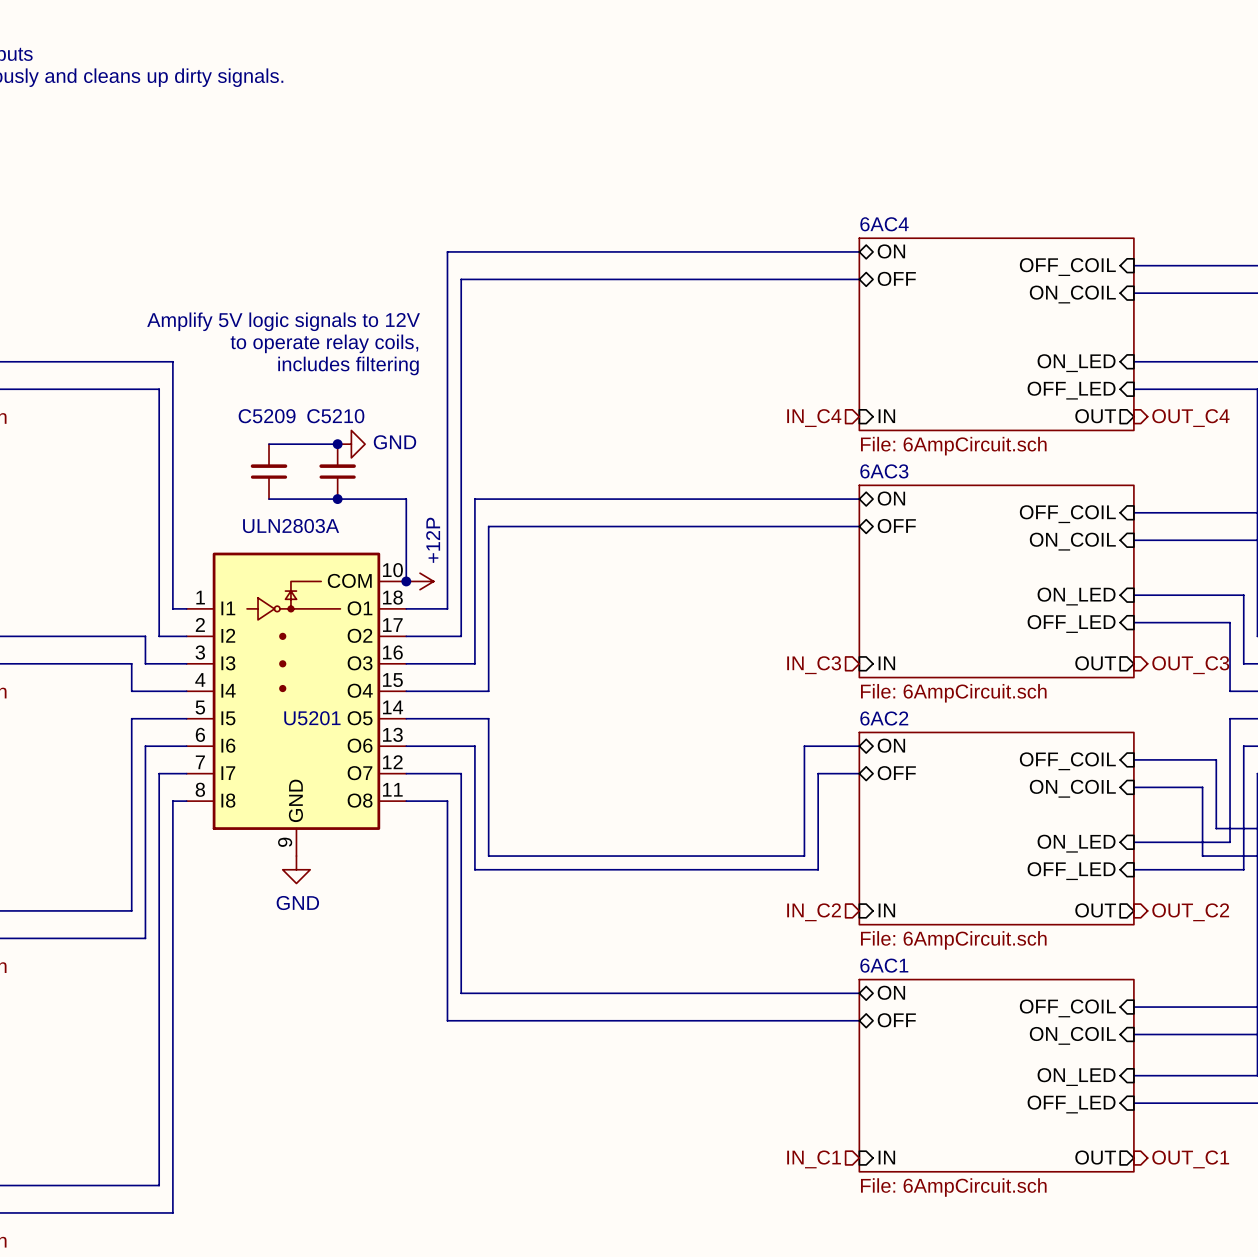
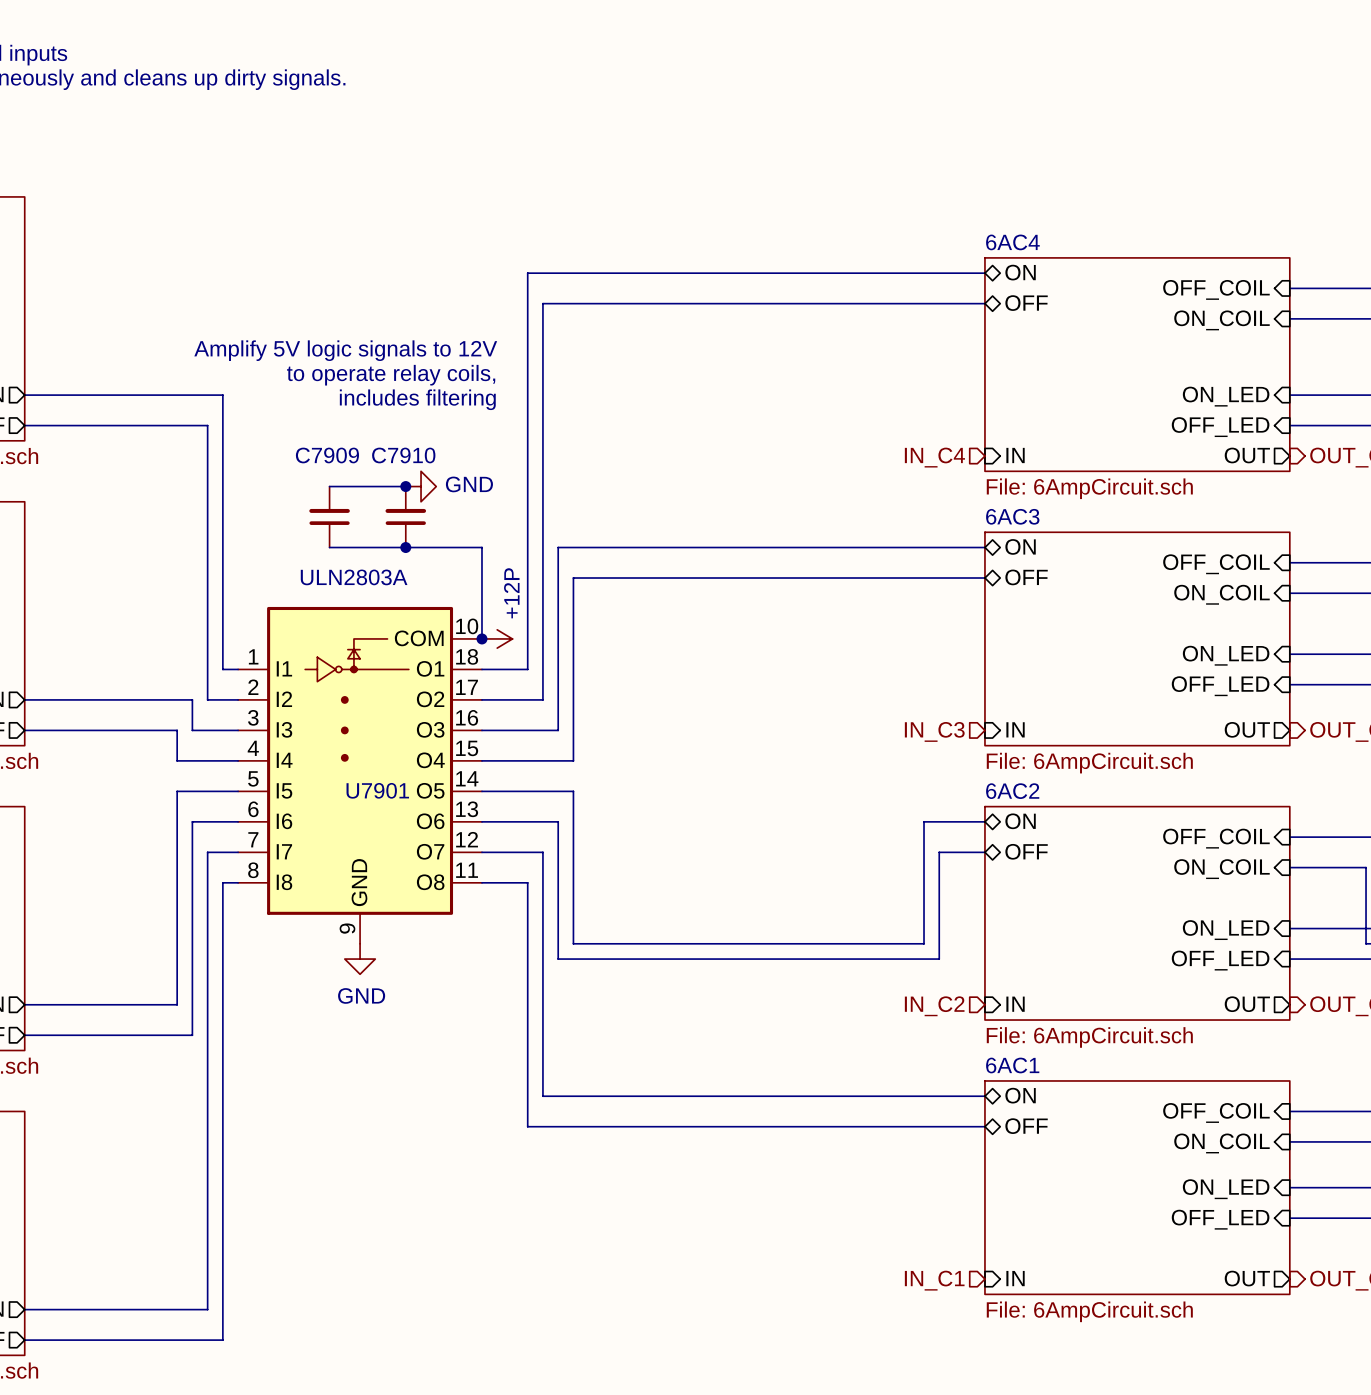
C5209 name: C5209 (267, 416) -> C7909 (327, 455)
C5210 name: C5210 (335, 416) -> C7910 (403, 455)
U5201 name: U5201 (312, 718) -> U7901 (377, 790)

